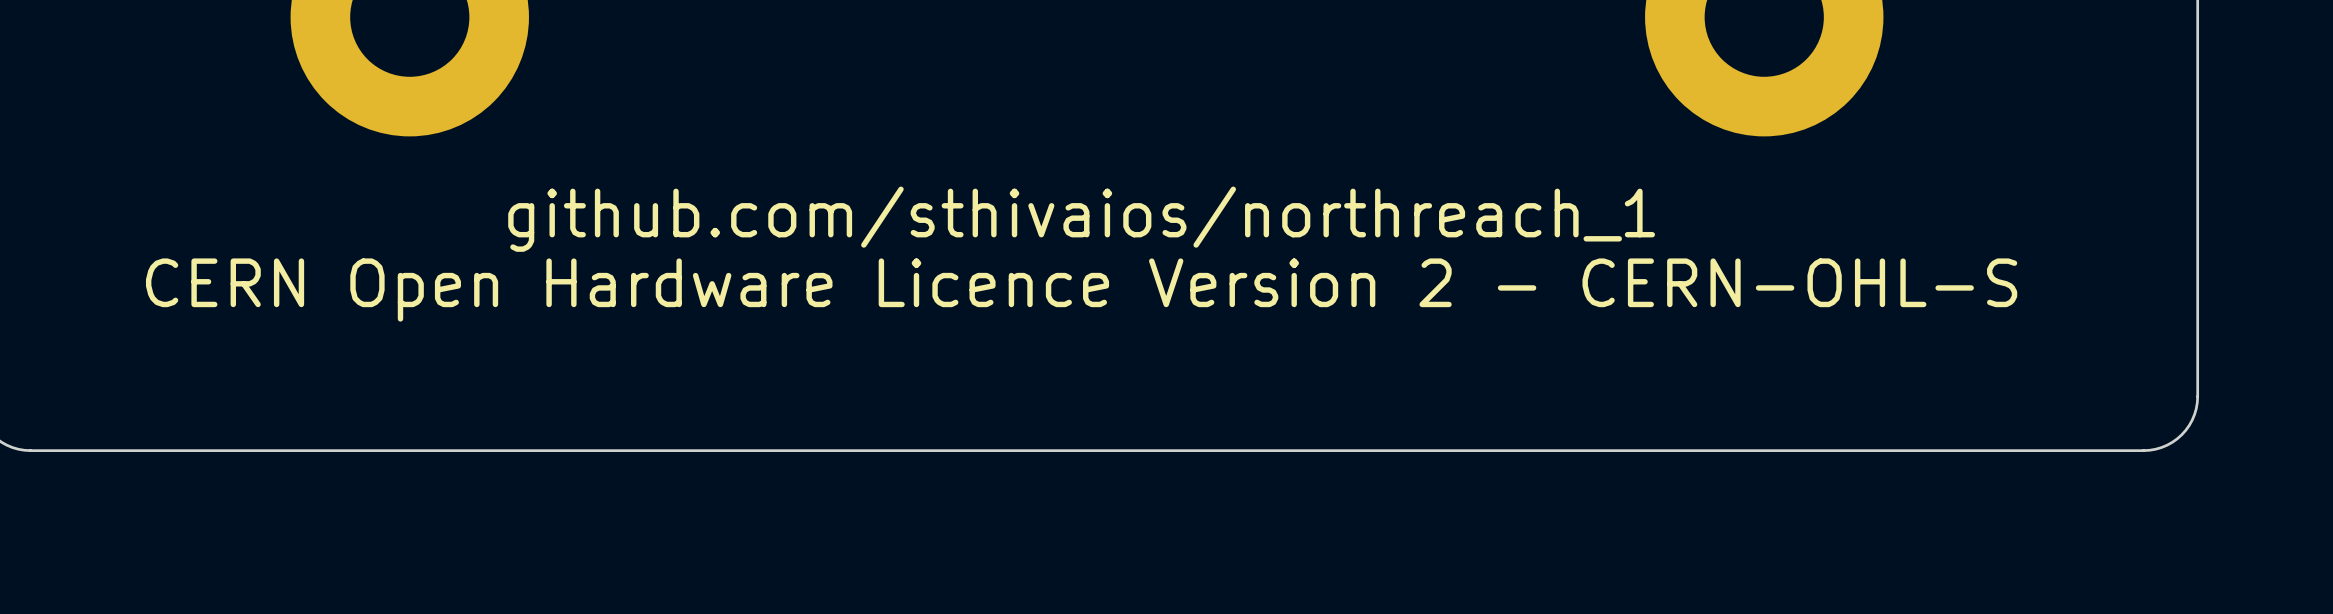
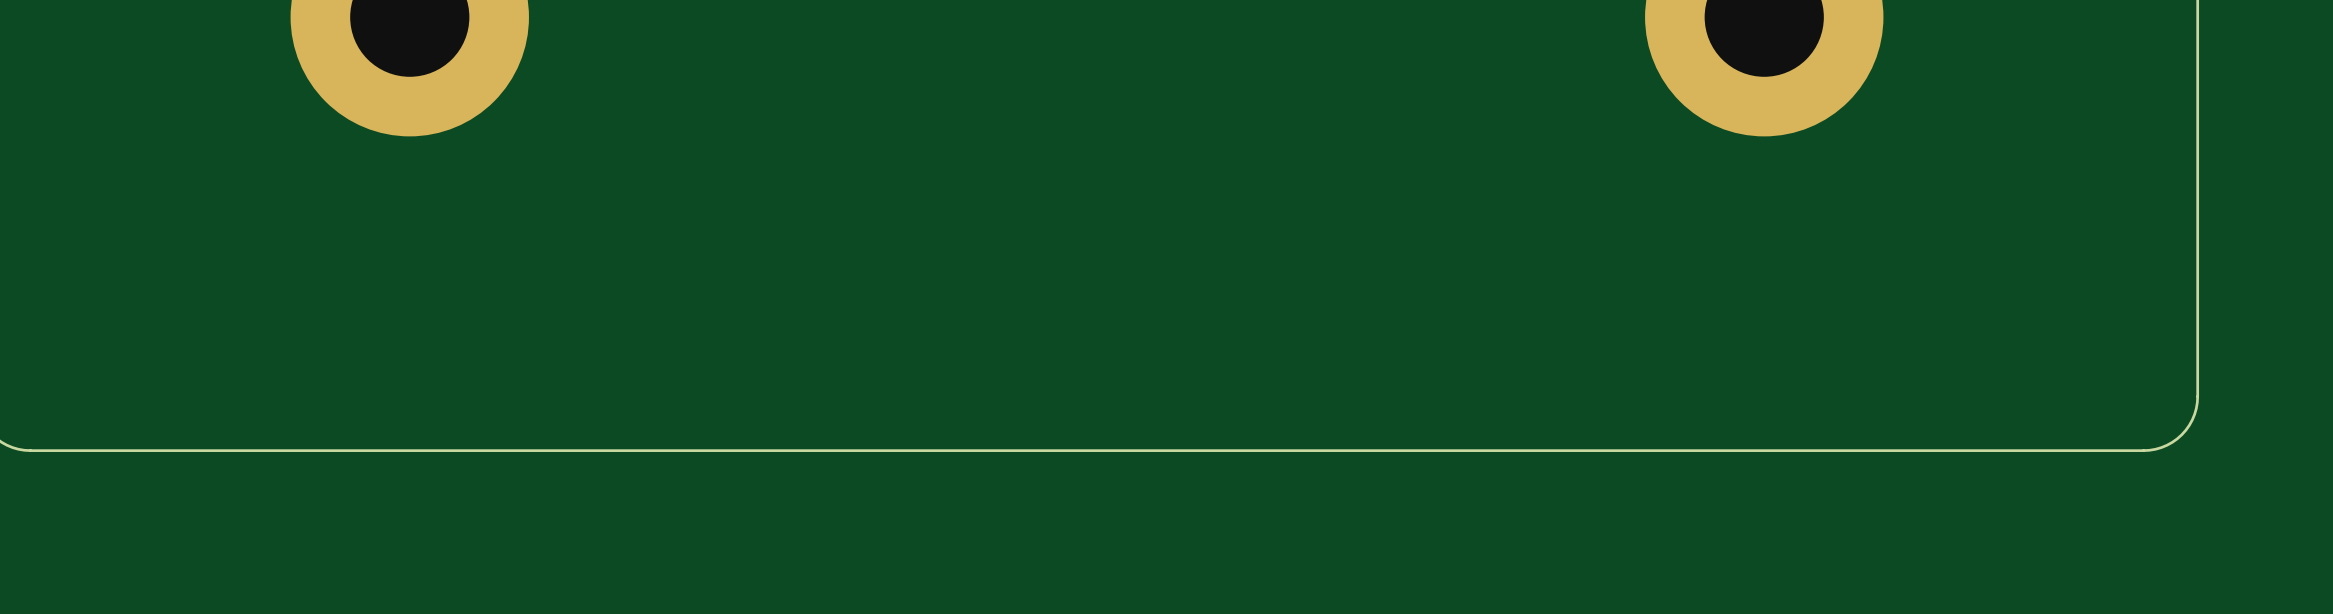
text: github.com/sthivaios/northreach_1 (1081, 219) -> none
text: CERN Open Hardware Licence Version 2 - CERN-OHL-S (1081, 290) -> none

